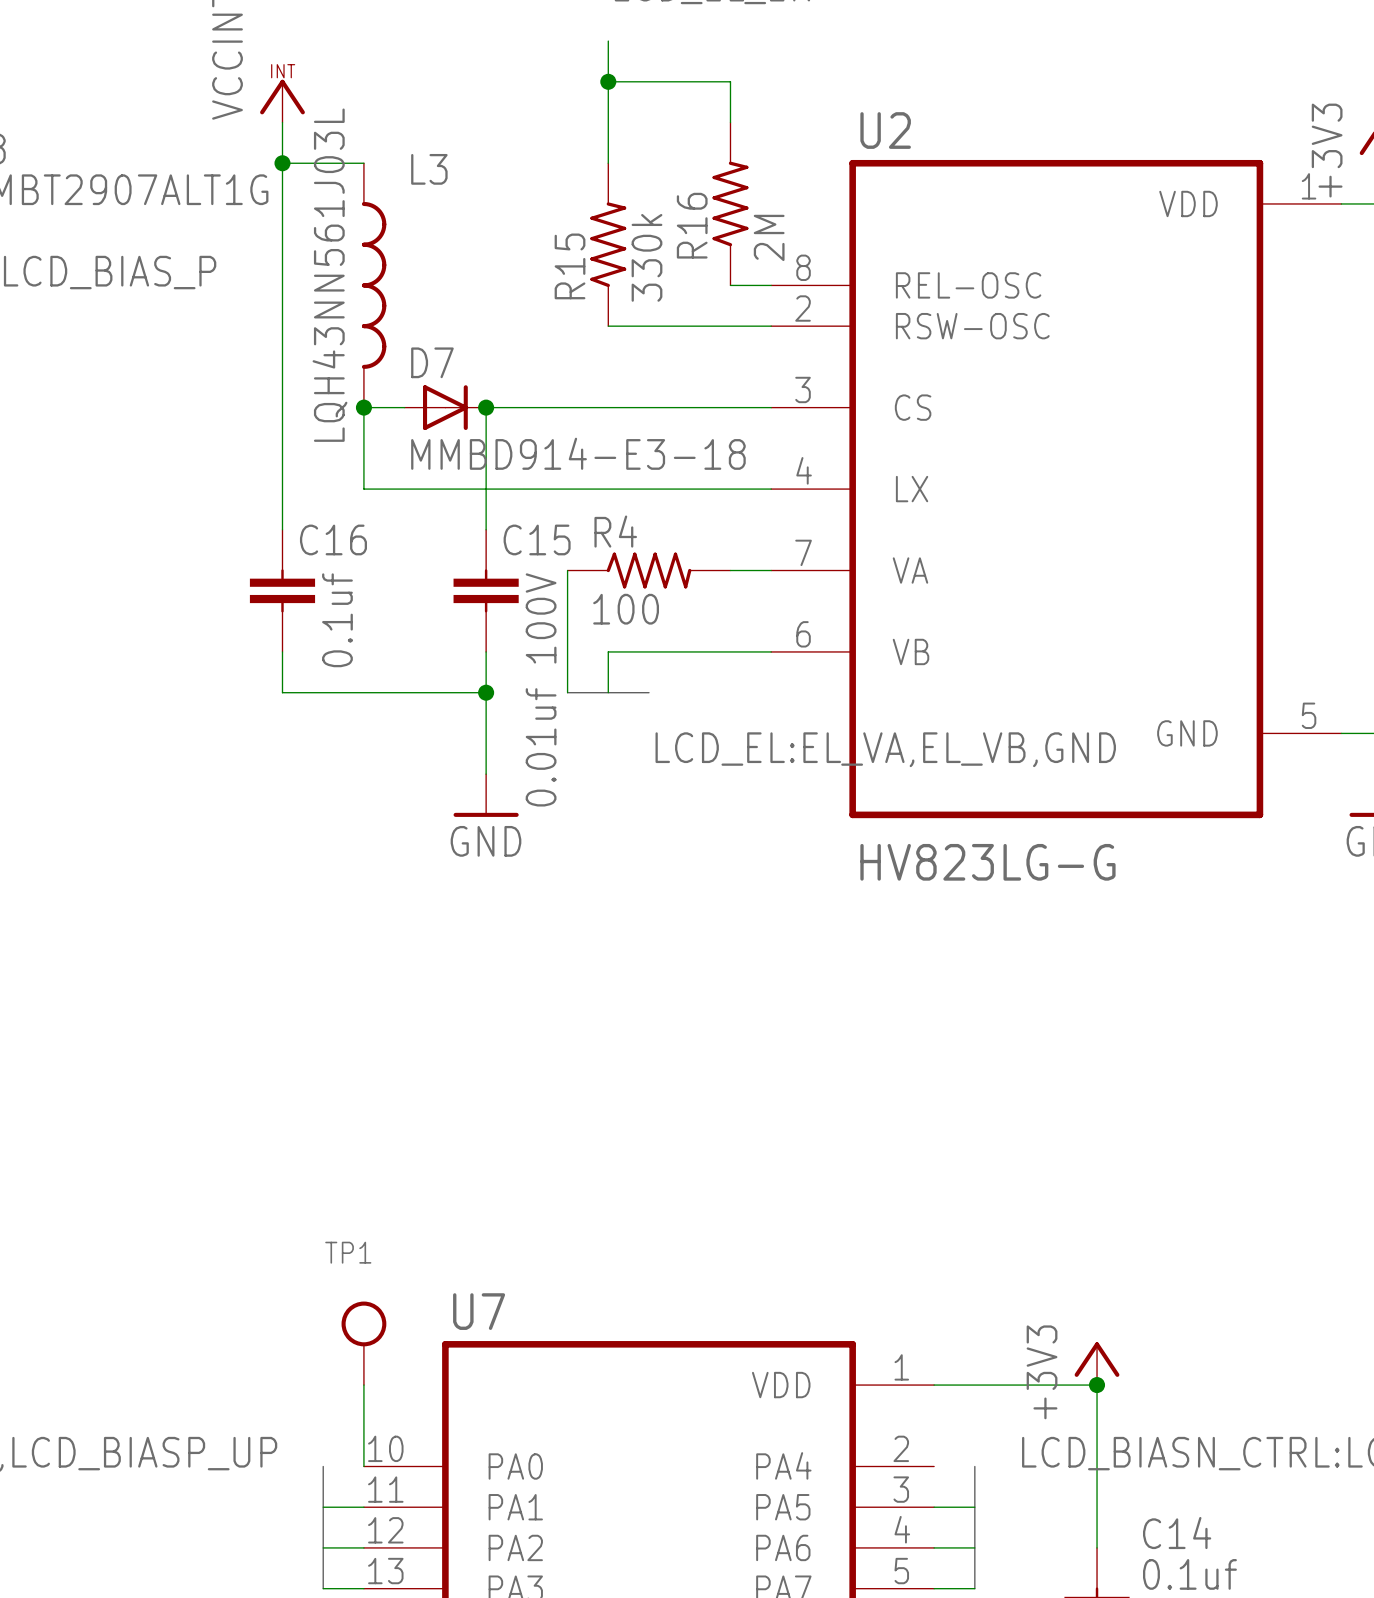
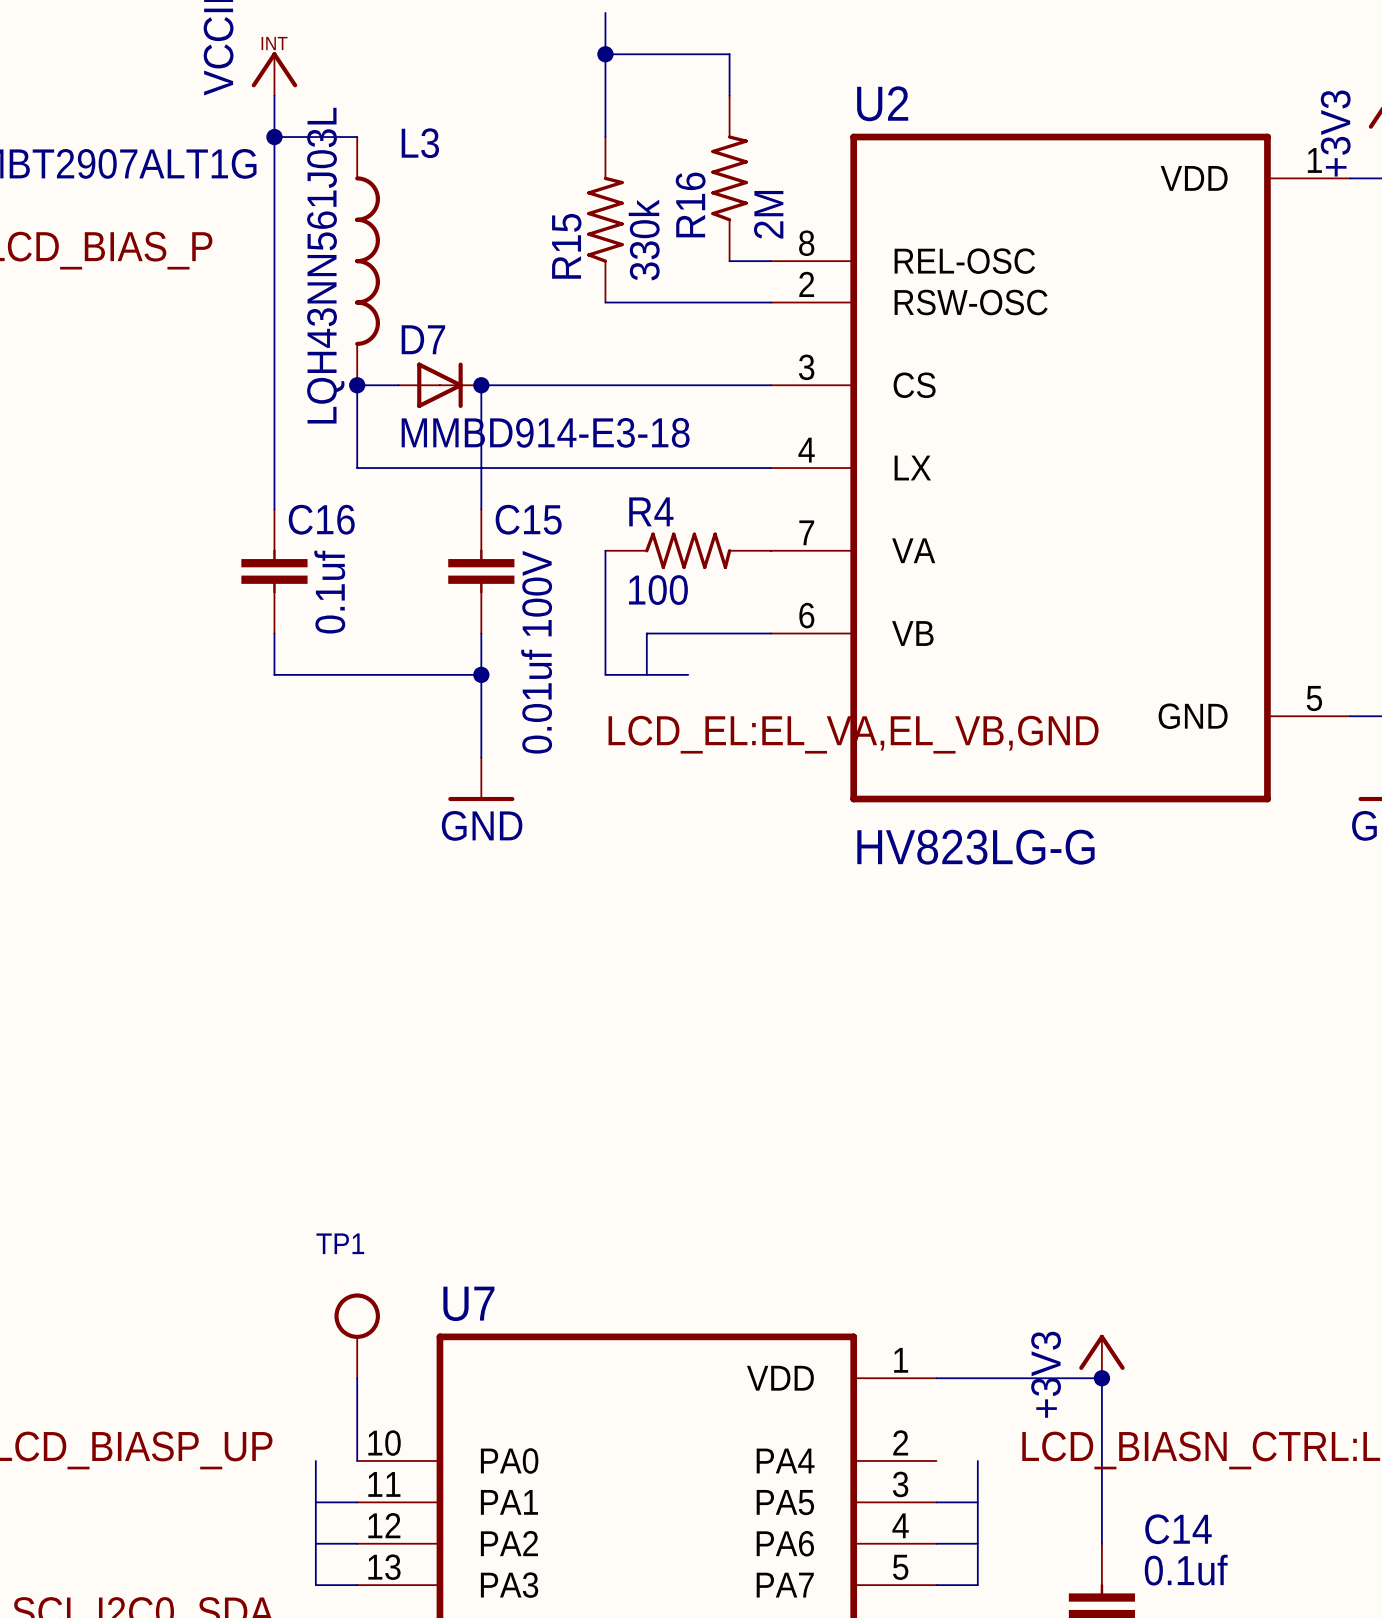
wire: (567, 570) (567, 692) -> none
wire: none -> (605, 550) (605, 633)
R4 position: (649, 570) -> (688, 550)
wire: (608, 651) (649, 651) -> (646, 674) (646, 633)
bus: (567, 692) (608, 692) -> (646, 674) (688, 674)
label position: LCD_EL:EL_VA,EL_VB,GND (885, 749) -> LCD_EL:EL_VA,EL_VB,GND (853, 734)

